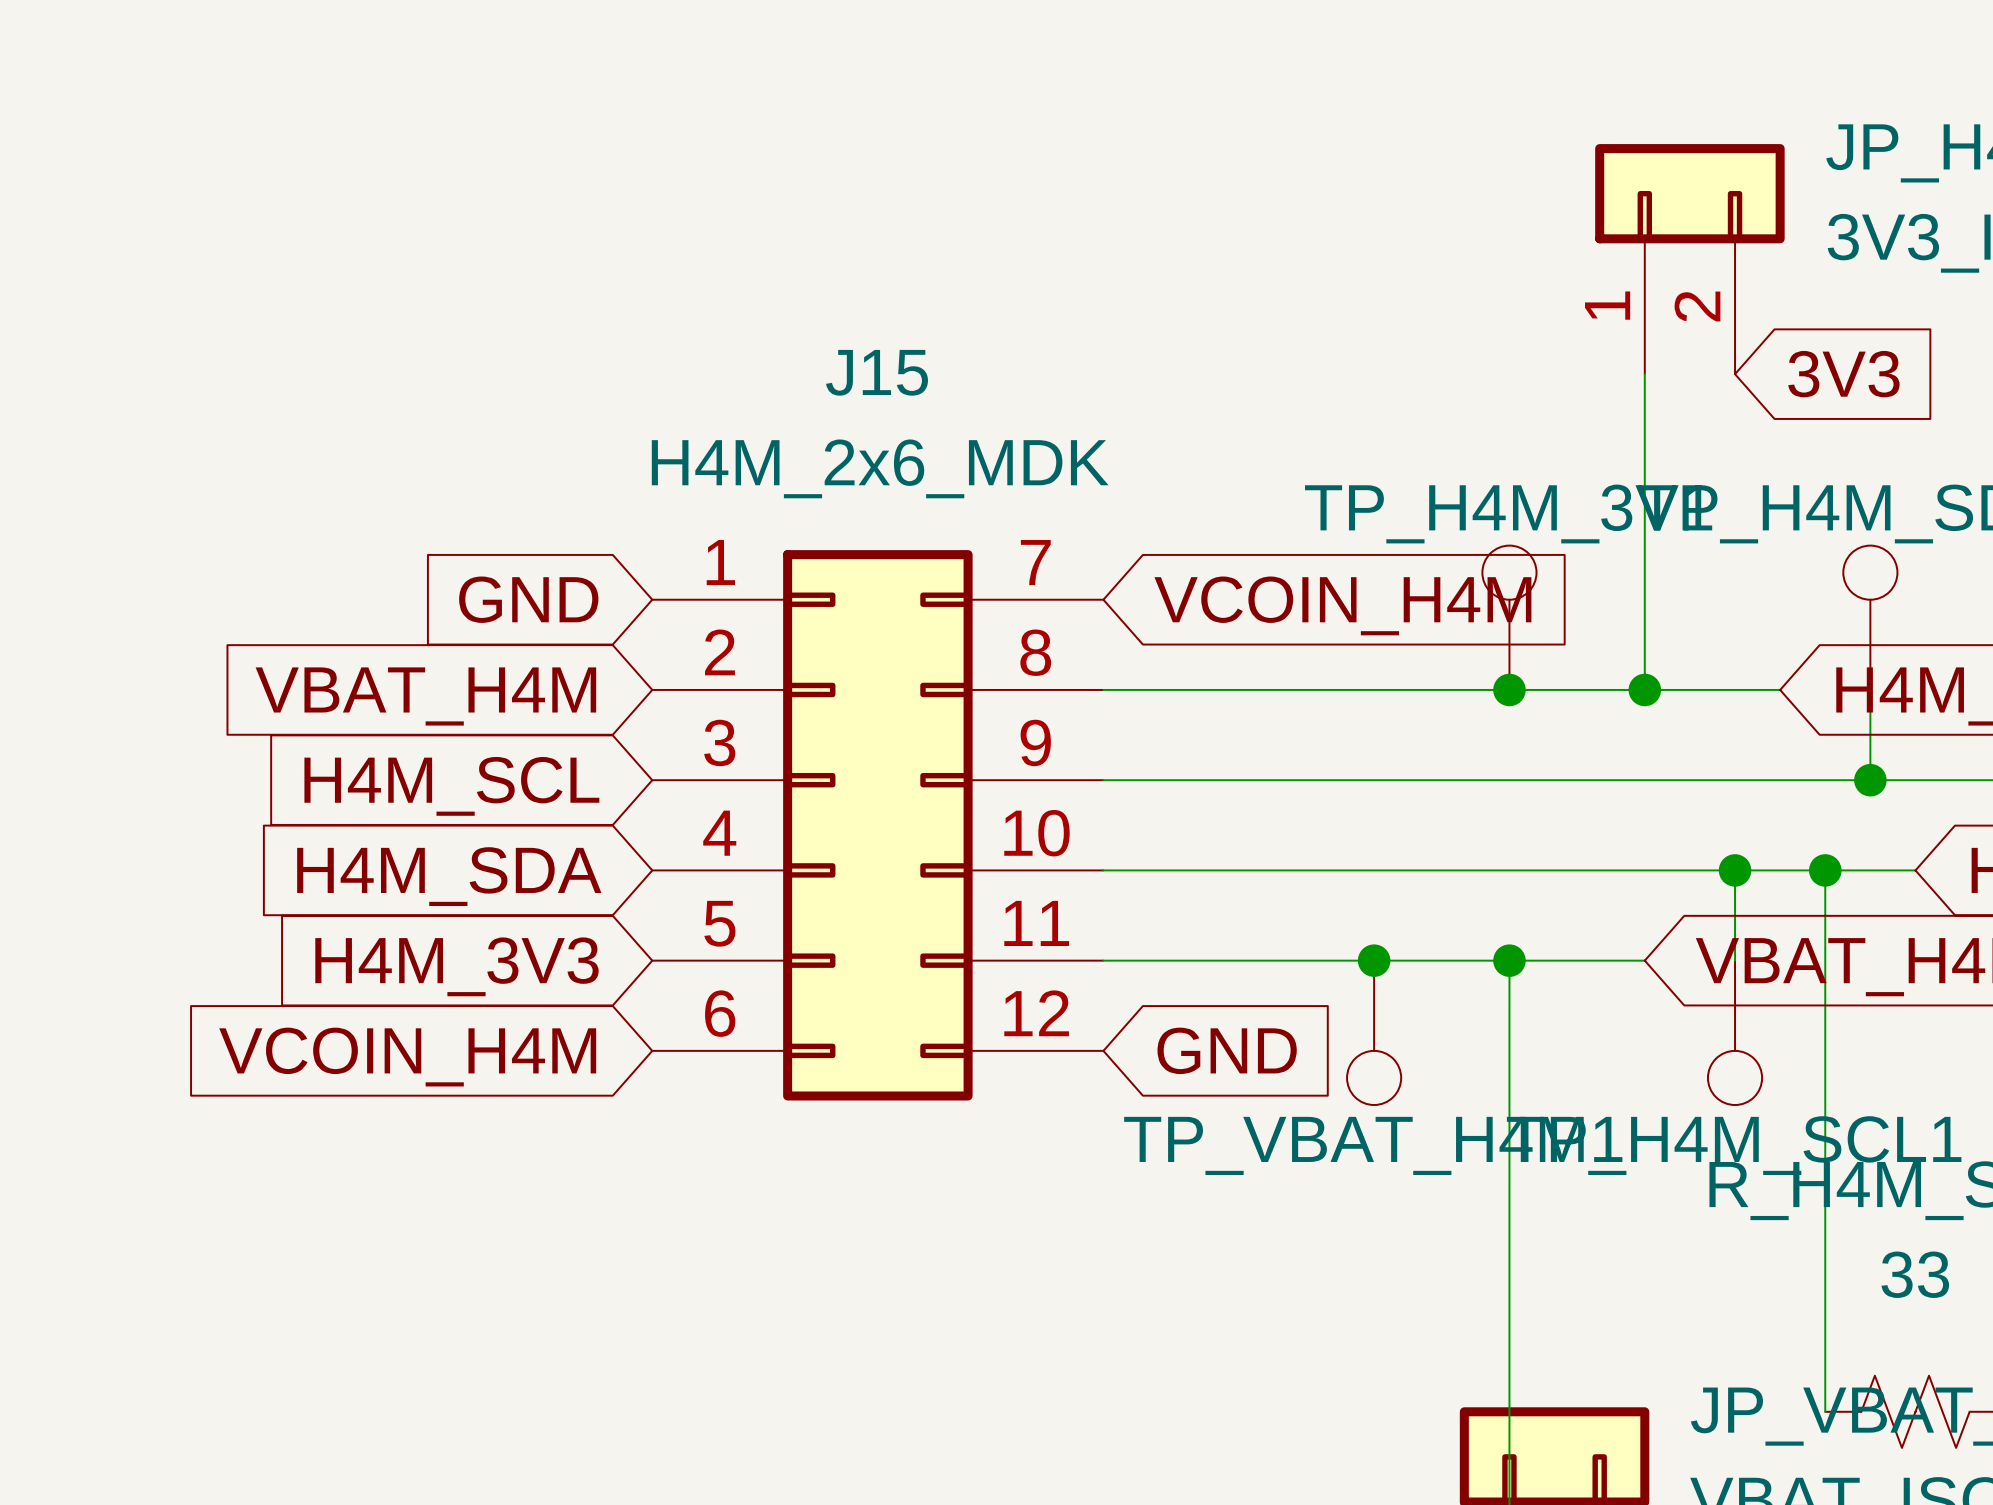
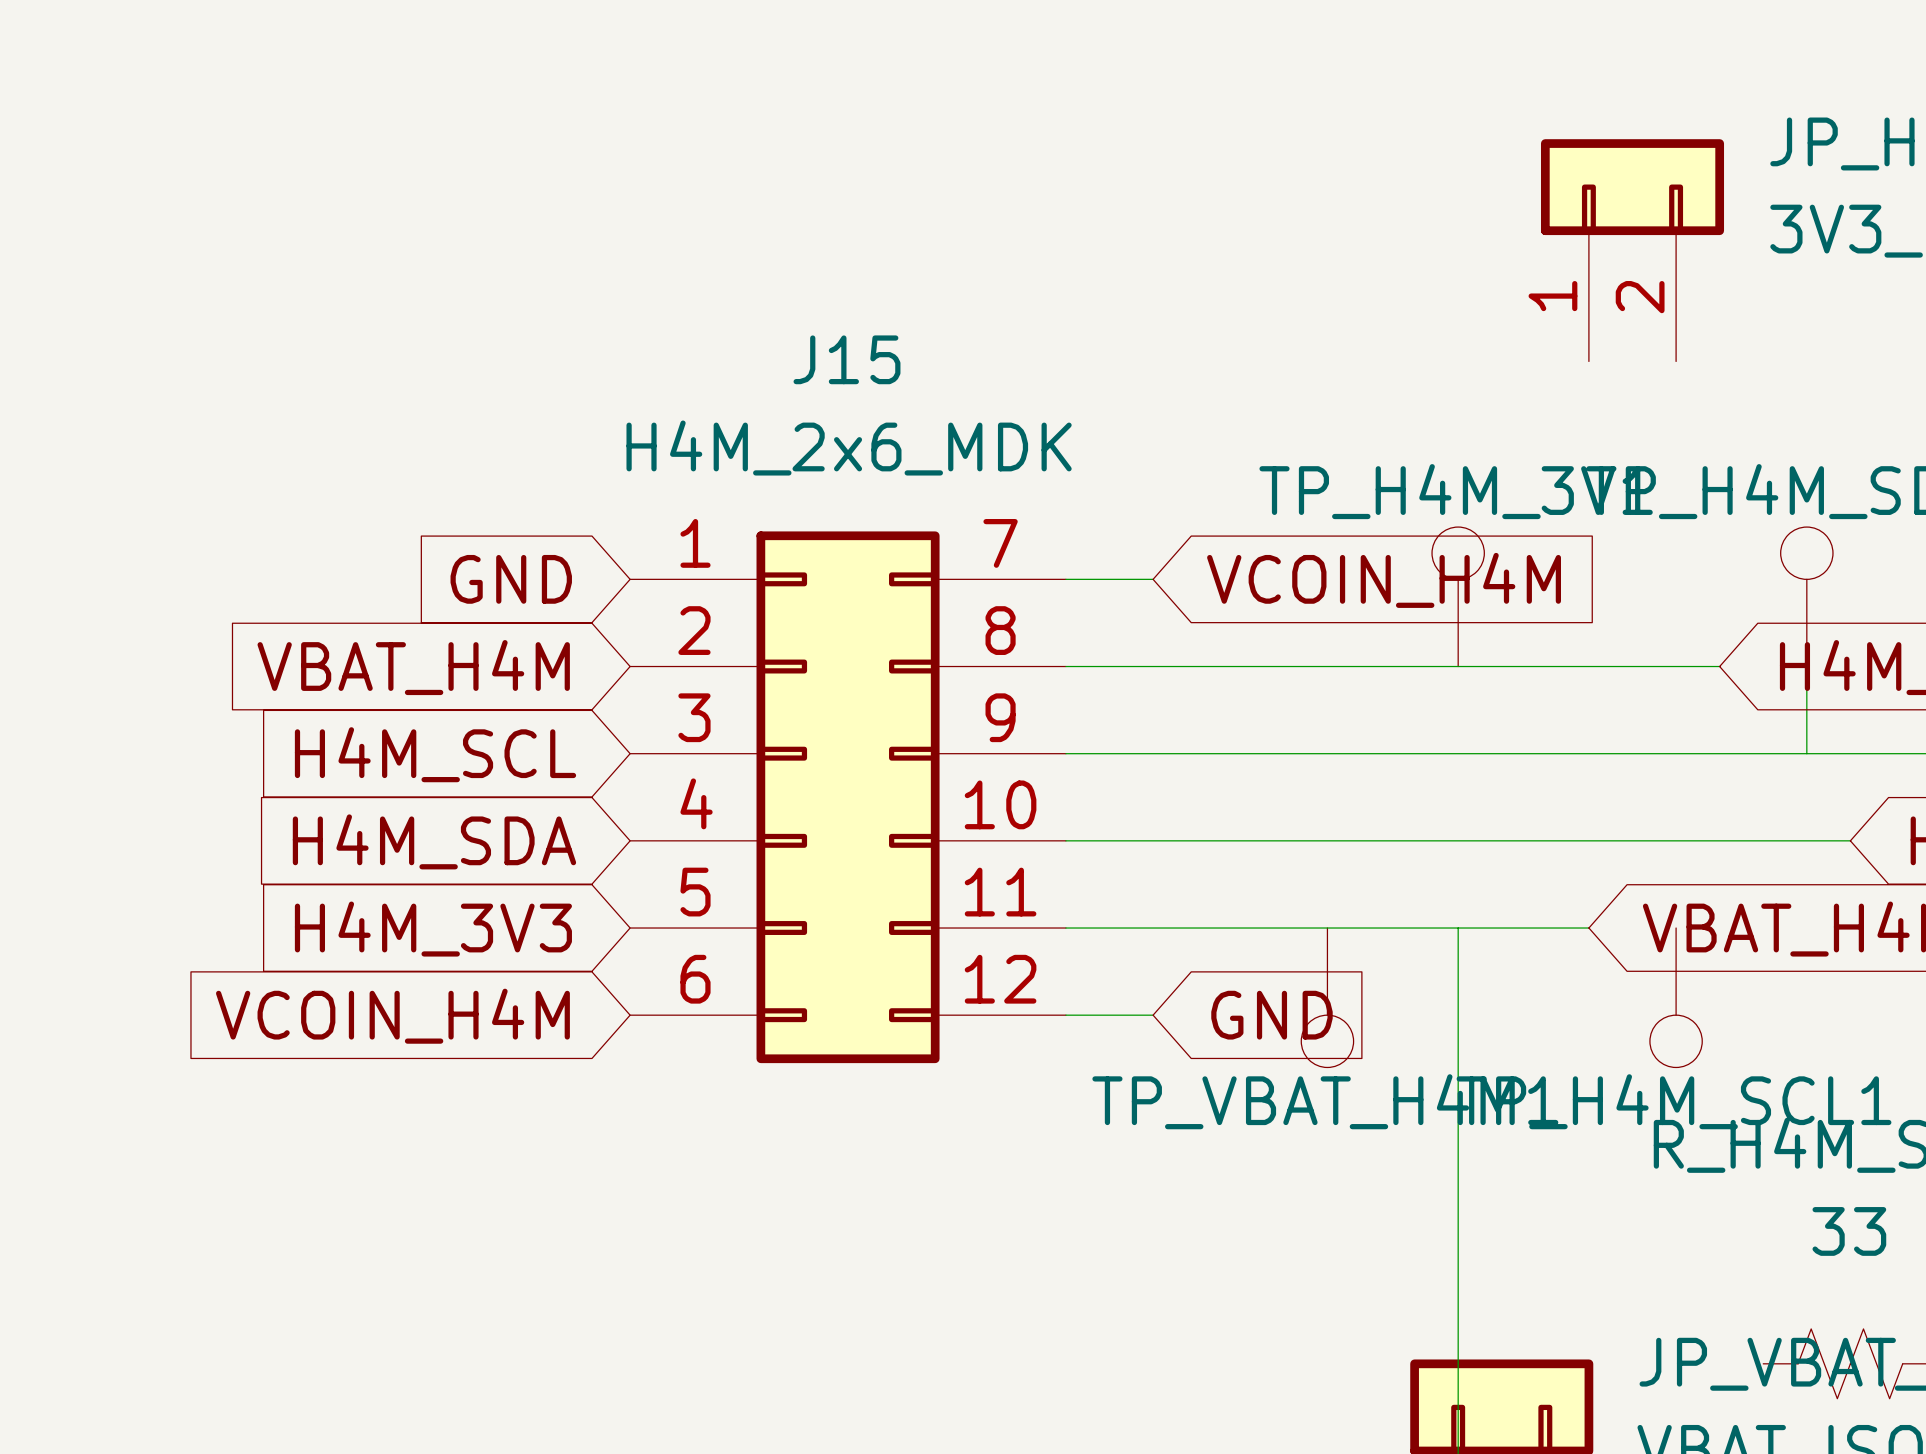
wire: (1644, 374) (1644, 689) -> none
global label: 3V3 (1843, 374) -> none
wire: none -> (1065, 579) (1153, 579)
global label position: VCOIN_H4M (1342, 605) -> VCOIN_H4M (1384, 580)
junction: (1509, 689) -> none
junction: (1644, 689) -> none
junction: (1870, 780) -> none
wire: (1735, 870) (1735, 960) -> none
junction: (1735, 870) -> none
wire: (1825, 870) (1825, 1411) -> none
junction: (1825, 870) -> none
junction: (1374, 960) -> none
junction: (1509, 960) -> none
wire: none -> (1065, 1015) (1153, 1015)
global label position: GND (1227, 1050) -> GND (1271, 1015)

